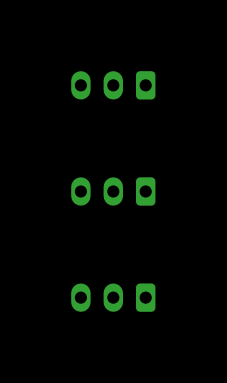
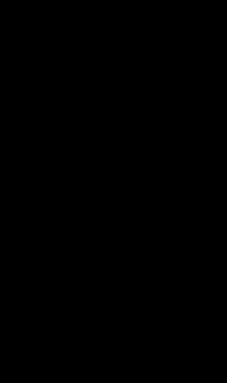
part: (113, 85) -> none
part: (113, 191) -> none
part: (113, 297) -> none

